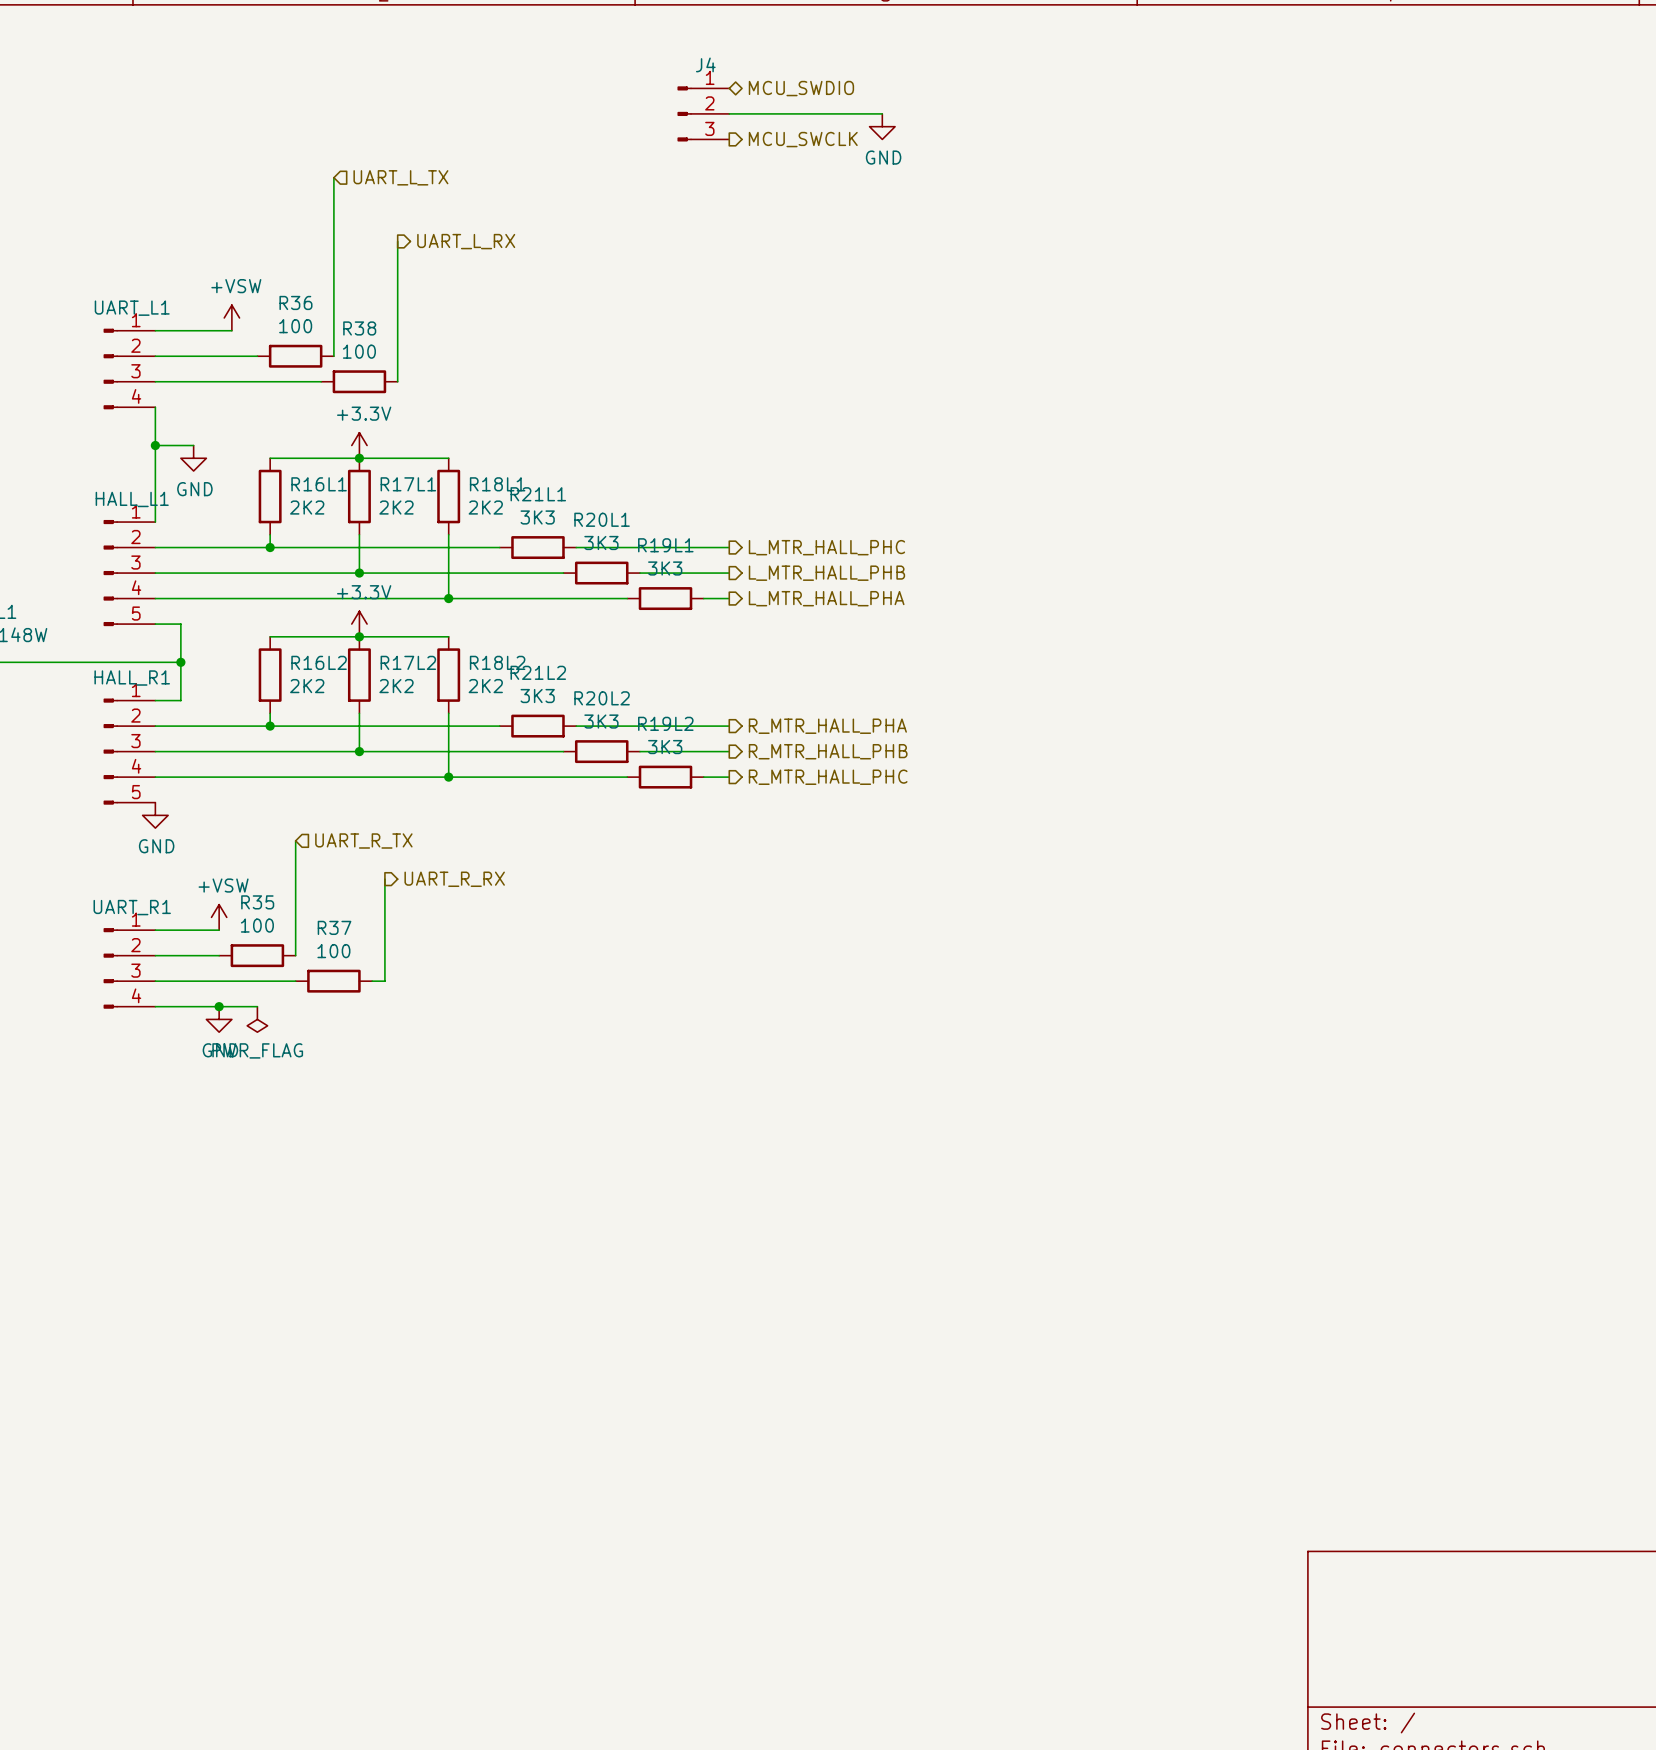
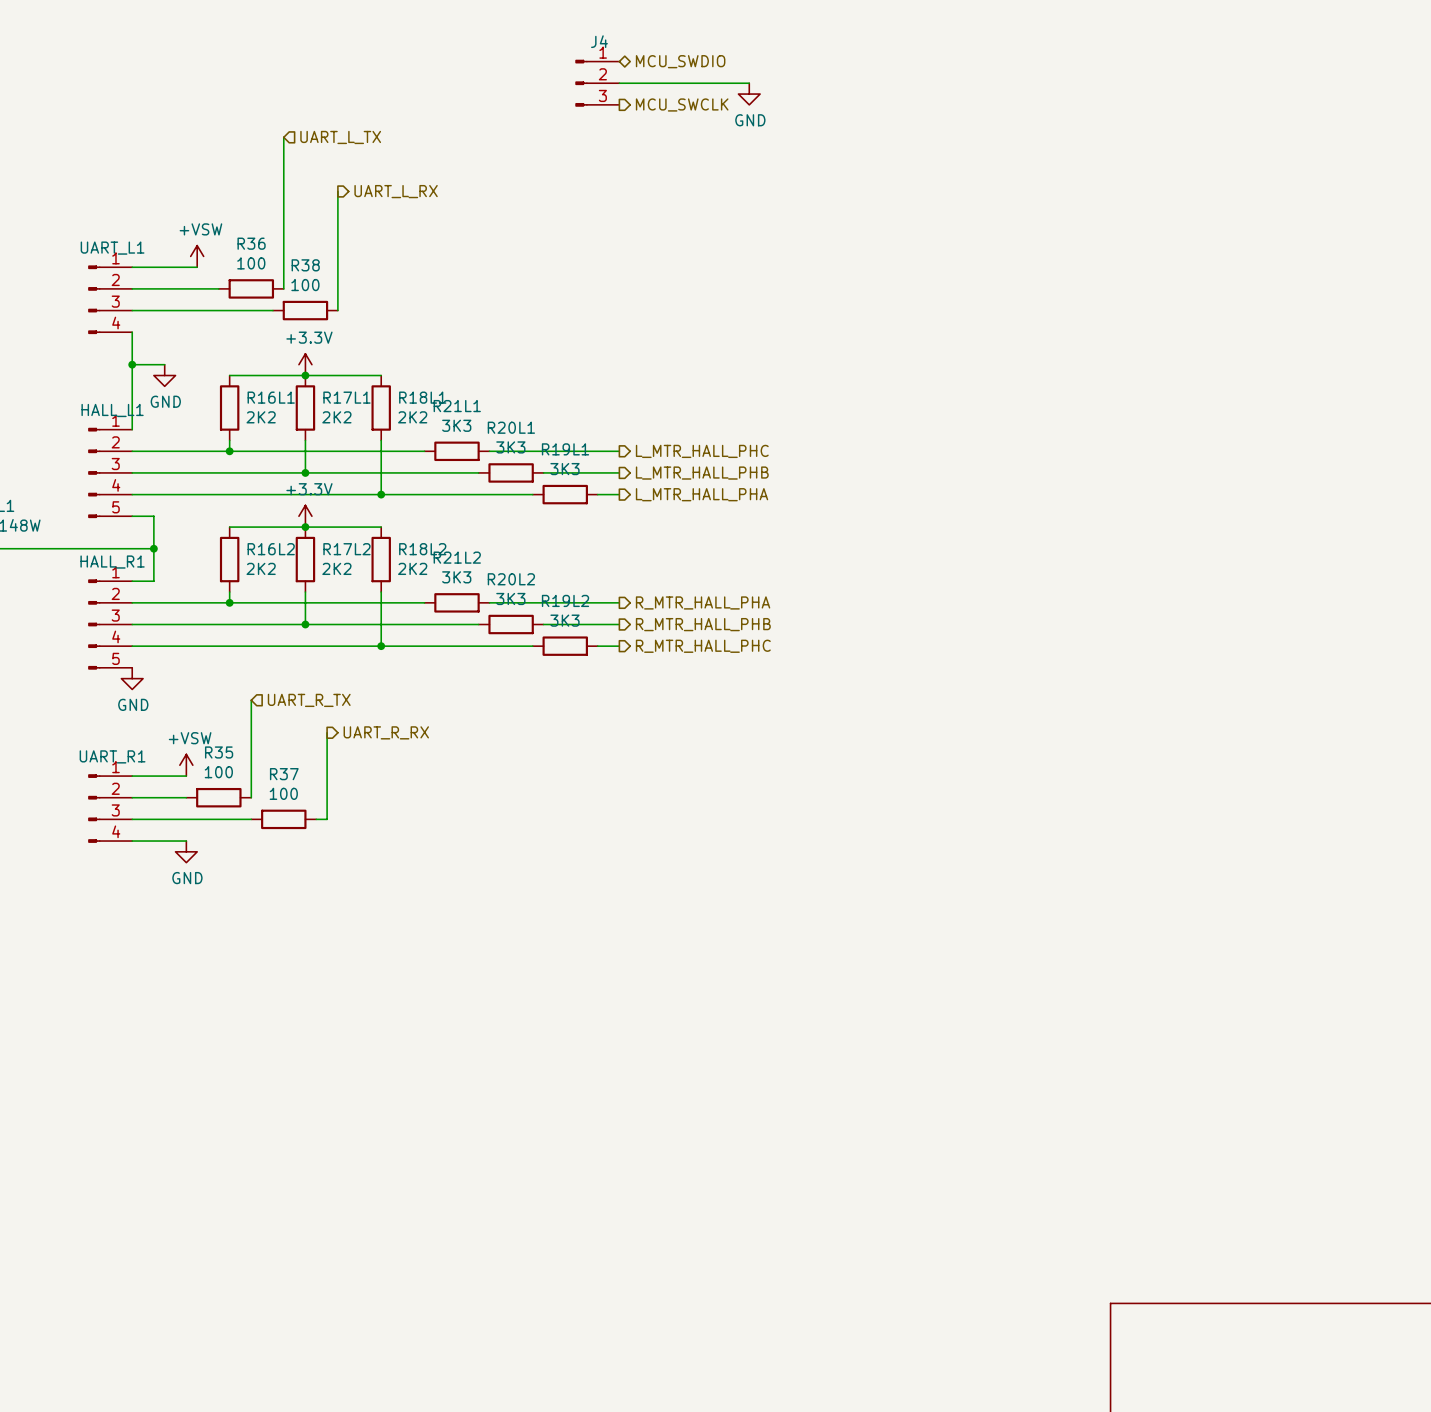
wire: (219, 1006) (257, 1006) -> none
junction: (219, 1006) -> none
power symbol: PWR_FLAG (257, 1019) -> none

